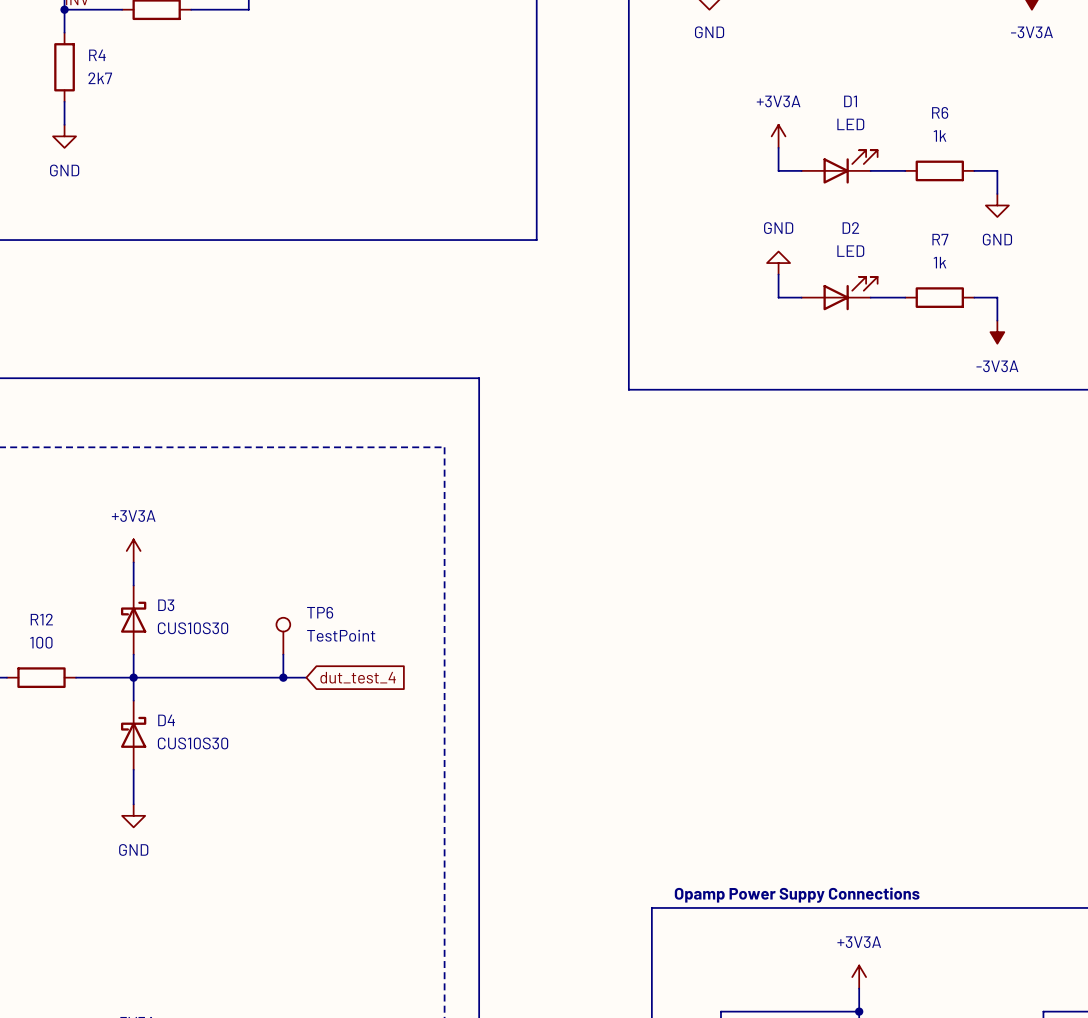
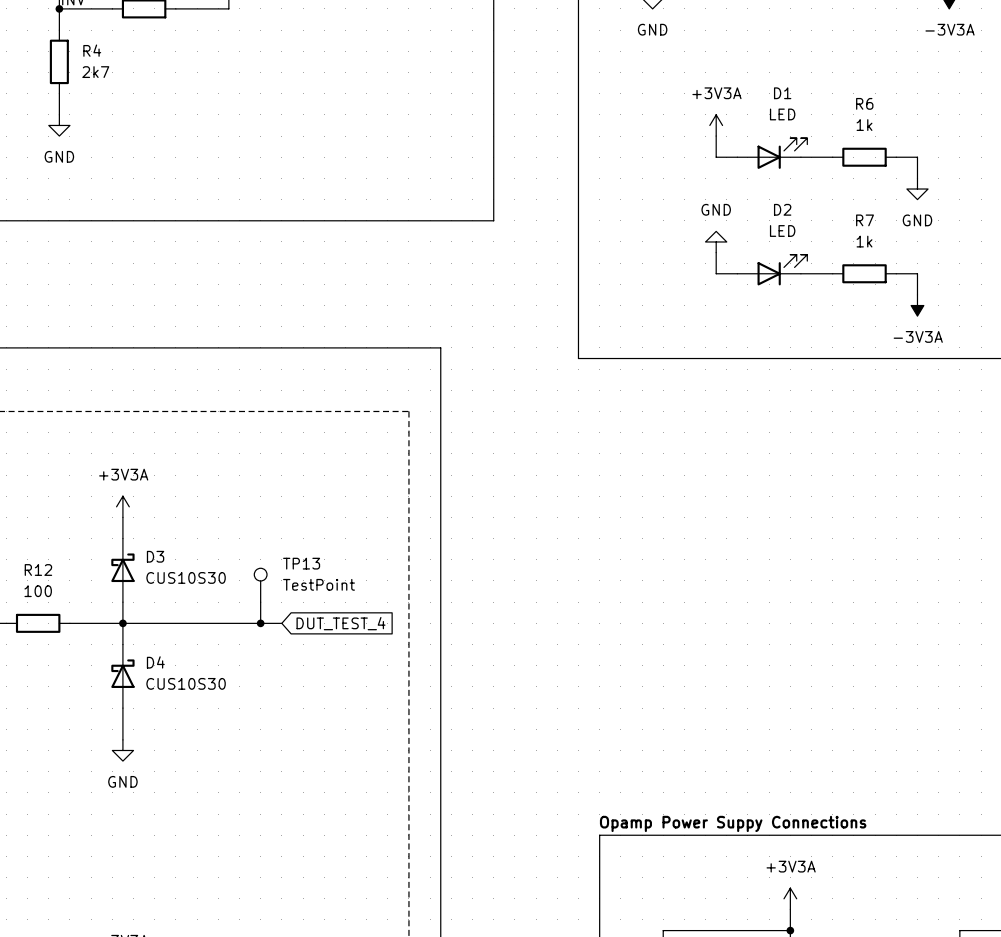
TP6 name: TP6 (320, 612) -> TP13 (301, 563)
global label: dut_test_4 (358, 677) -> DUT_TEST_4 (341, 623)

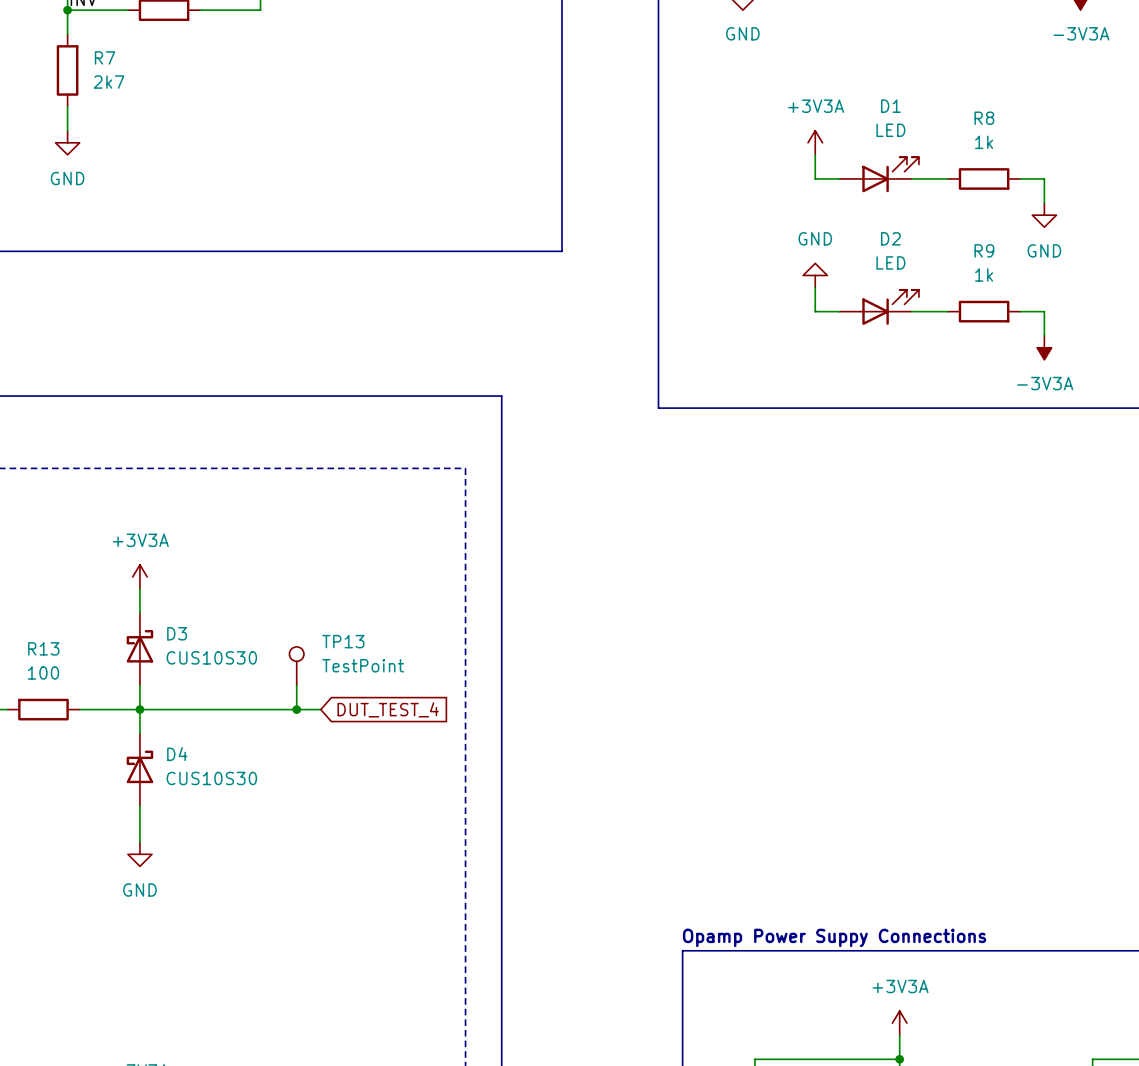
R4 name: R4 (92, 50) -> R7 (105, 57)
R6 name: R6 (864, 103) -> R8 (984, 118)
R7 name: R7 (865, 220) -> R9 (984, 250)
R12 name: R12 (38, 570) -> R13 (43, 648)

